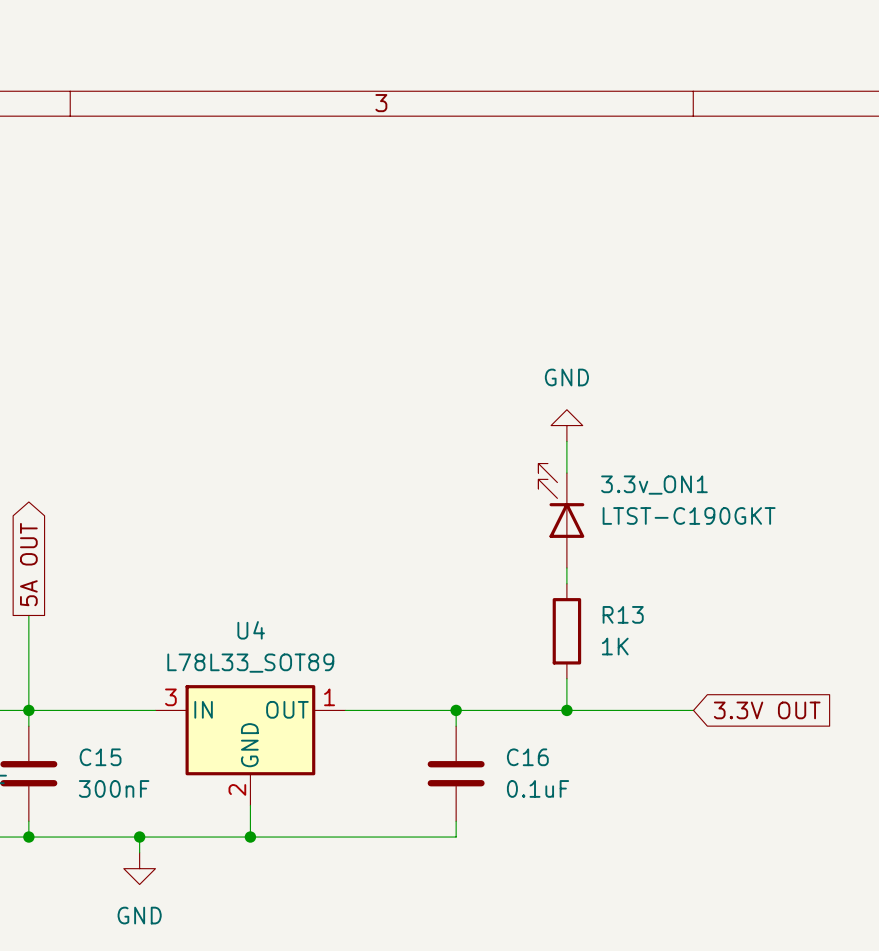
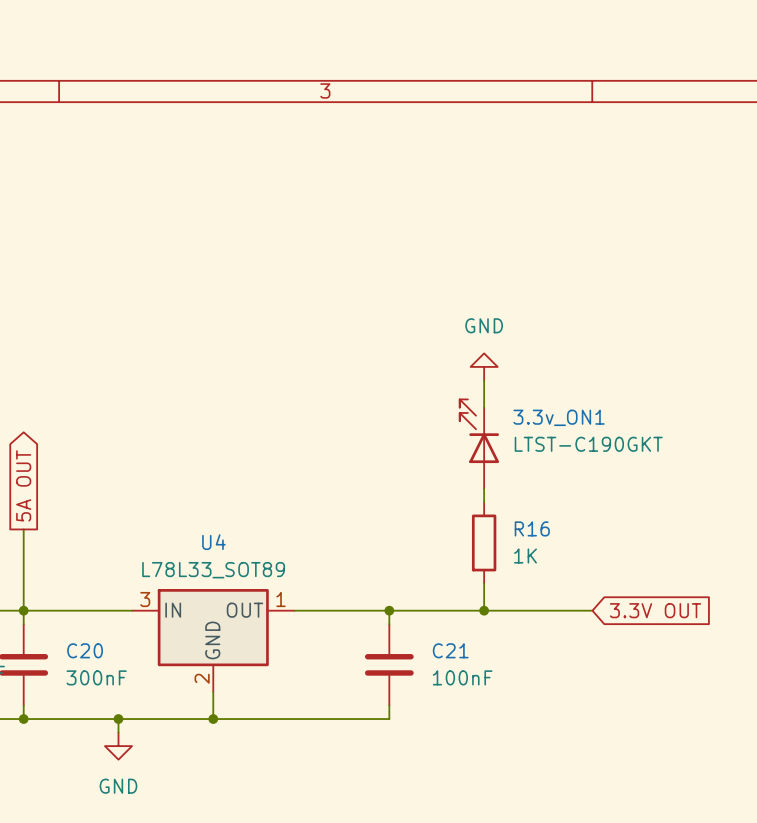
R13 name: R13 (623, 614) -> R16 (532, 528)
C15 name: C15 (100, 757) -> C20 (85, 650)
C16 name: C16 (527, 757) -> C21 (450, 650)
C16 value: 0.1uF (538, 788) -> 100nF (462, 677)

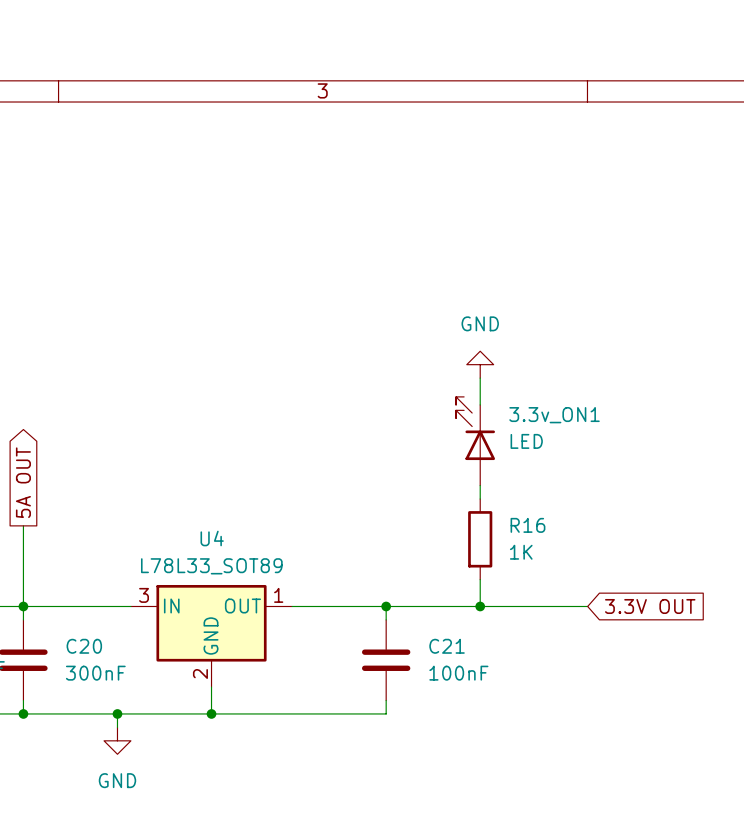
3.3v_ON1 value: LTST-C190GKT (588, 444) -> LED (526, 441)

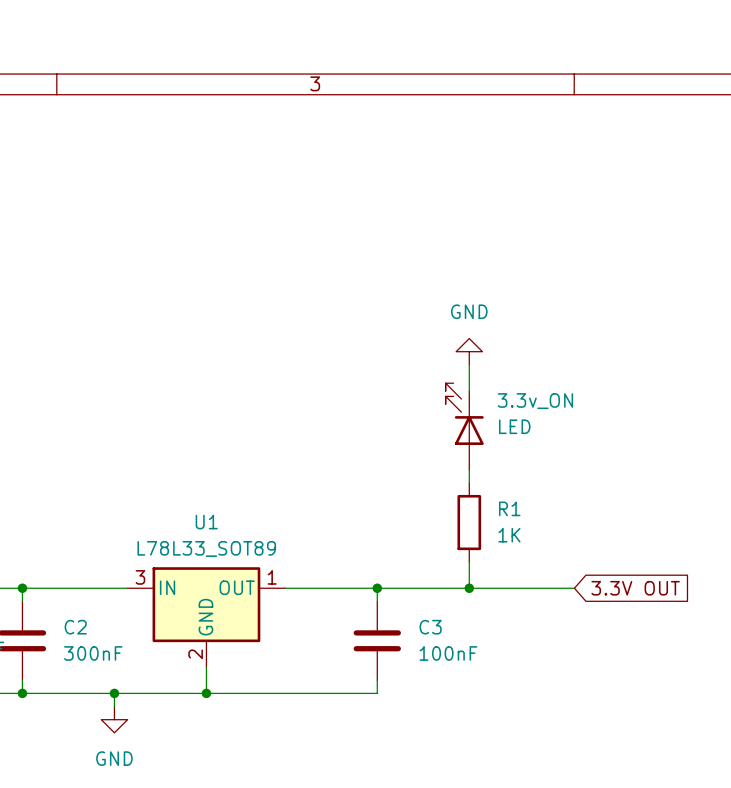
3.3v_ON1 name: 3.3v_ON1 (554, 415) -> 3.3v_ON (535, 401)
global label: 5A OUT (23, 482) -> none
wire: (23, 525) (23, 606) -> none
R16 name: R16 (527, 525) -> R1 (509, 508)
U4 name: U4 (212, 538) -> U1 (206, 522)
C20 name: C20 (84, 646) -> C2 (75, 627)
C21 name: C21 (447, 646) -> C3 (430, 627)

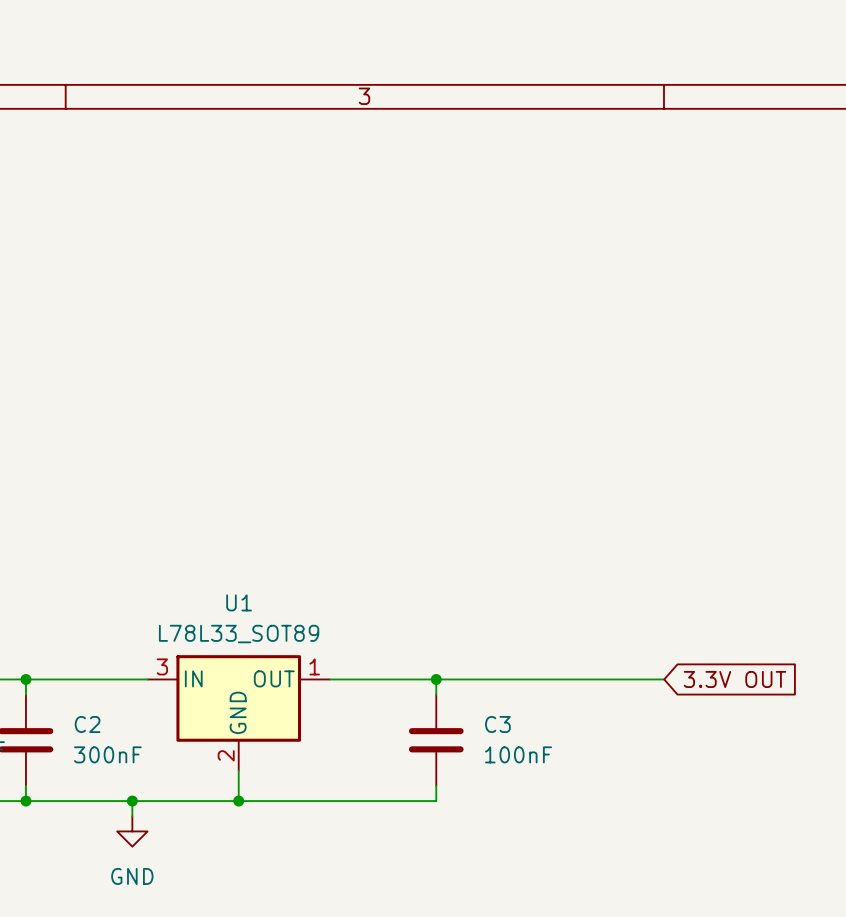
power symbol: GND (469, 351) -> none
wire: (469, 364) (469, 391) -> none
3.3v_ON: LED (464, 426) -> none
wire: (469, 469) (469, 483) -> none
R1: 1K (469, 522) -> none
wire: (469, 561) (469, 588) -> none
junction: (469, 588) -> none

